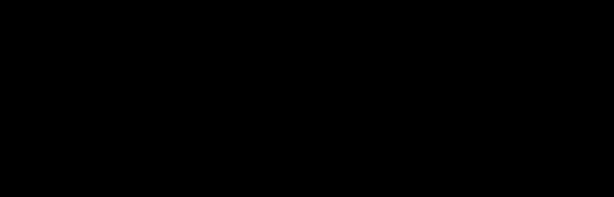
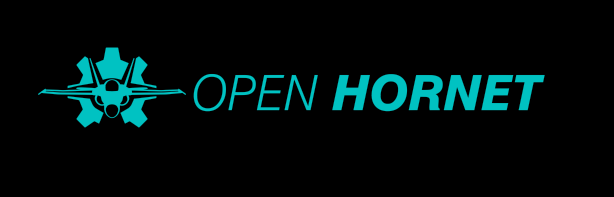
drawing: none -> [38, 47, 545, 128]

